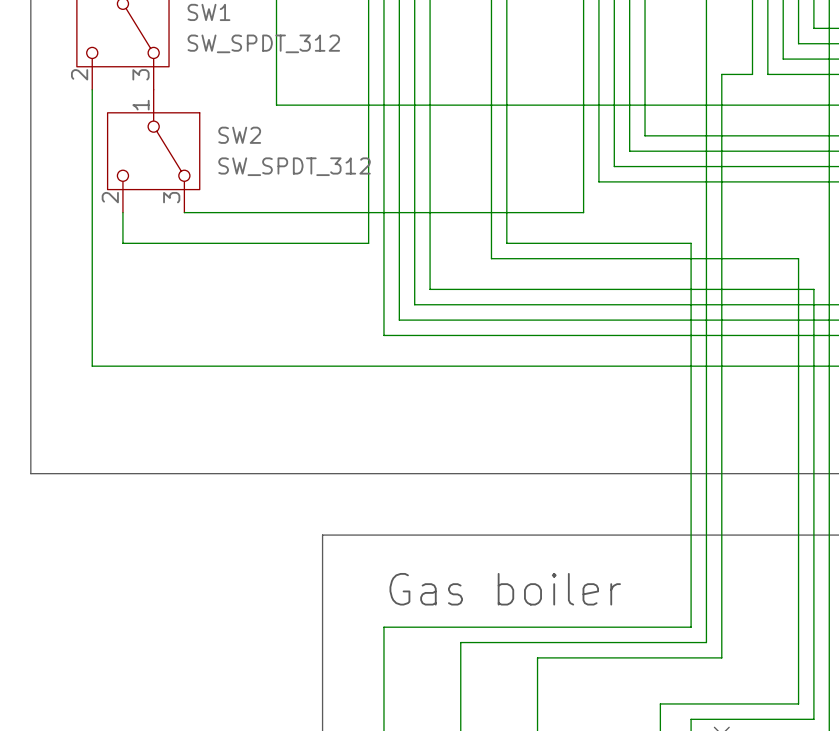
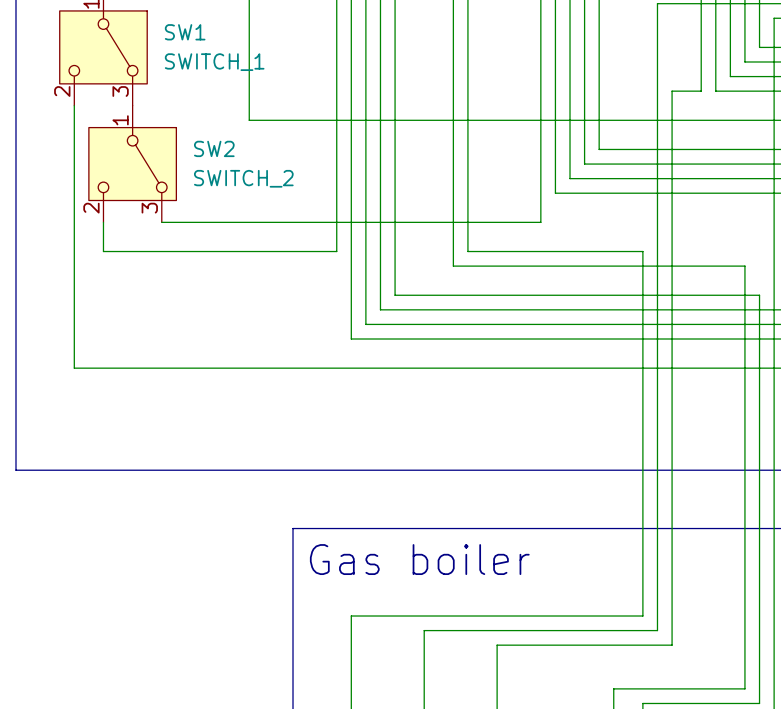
SW1 value: SW_SPDT_312 (263, 43) -> SWITCH_1 (214, 62)
SW2 value: SW_SPDT_312 (294, 166) -> SWITCH_2 (243, 178)
text position: Gas boiler (505, 589) -> Gas boiler (419, 559)

